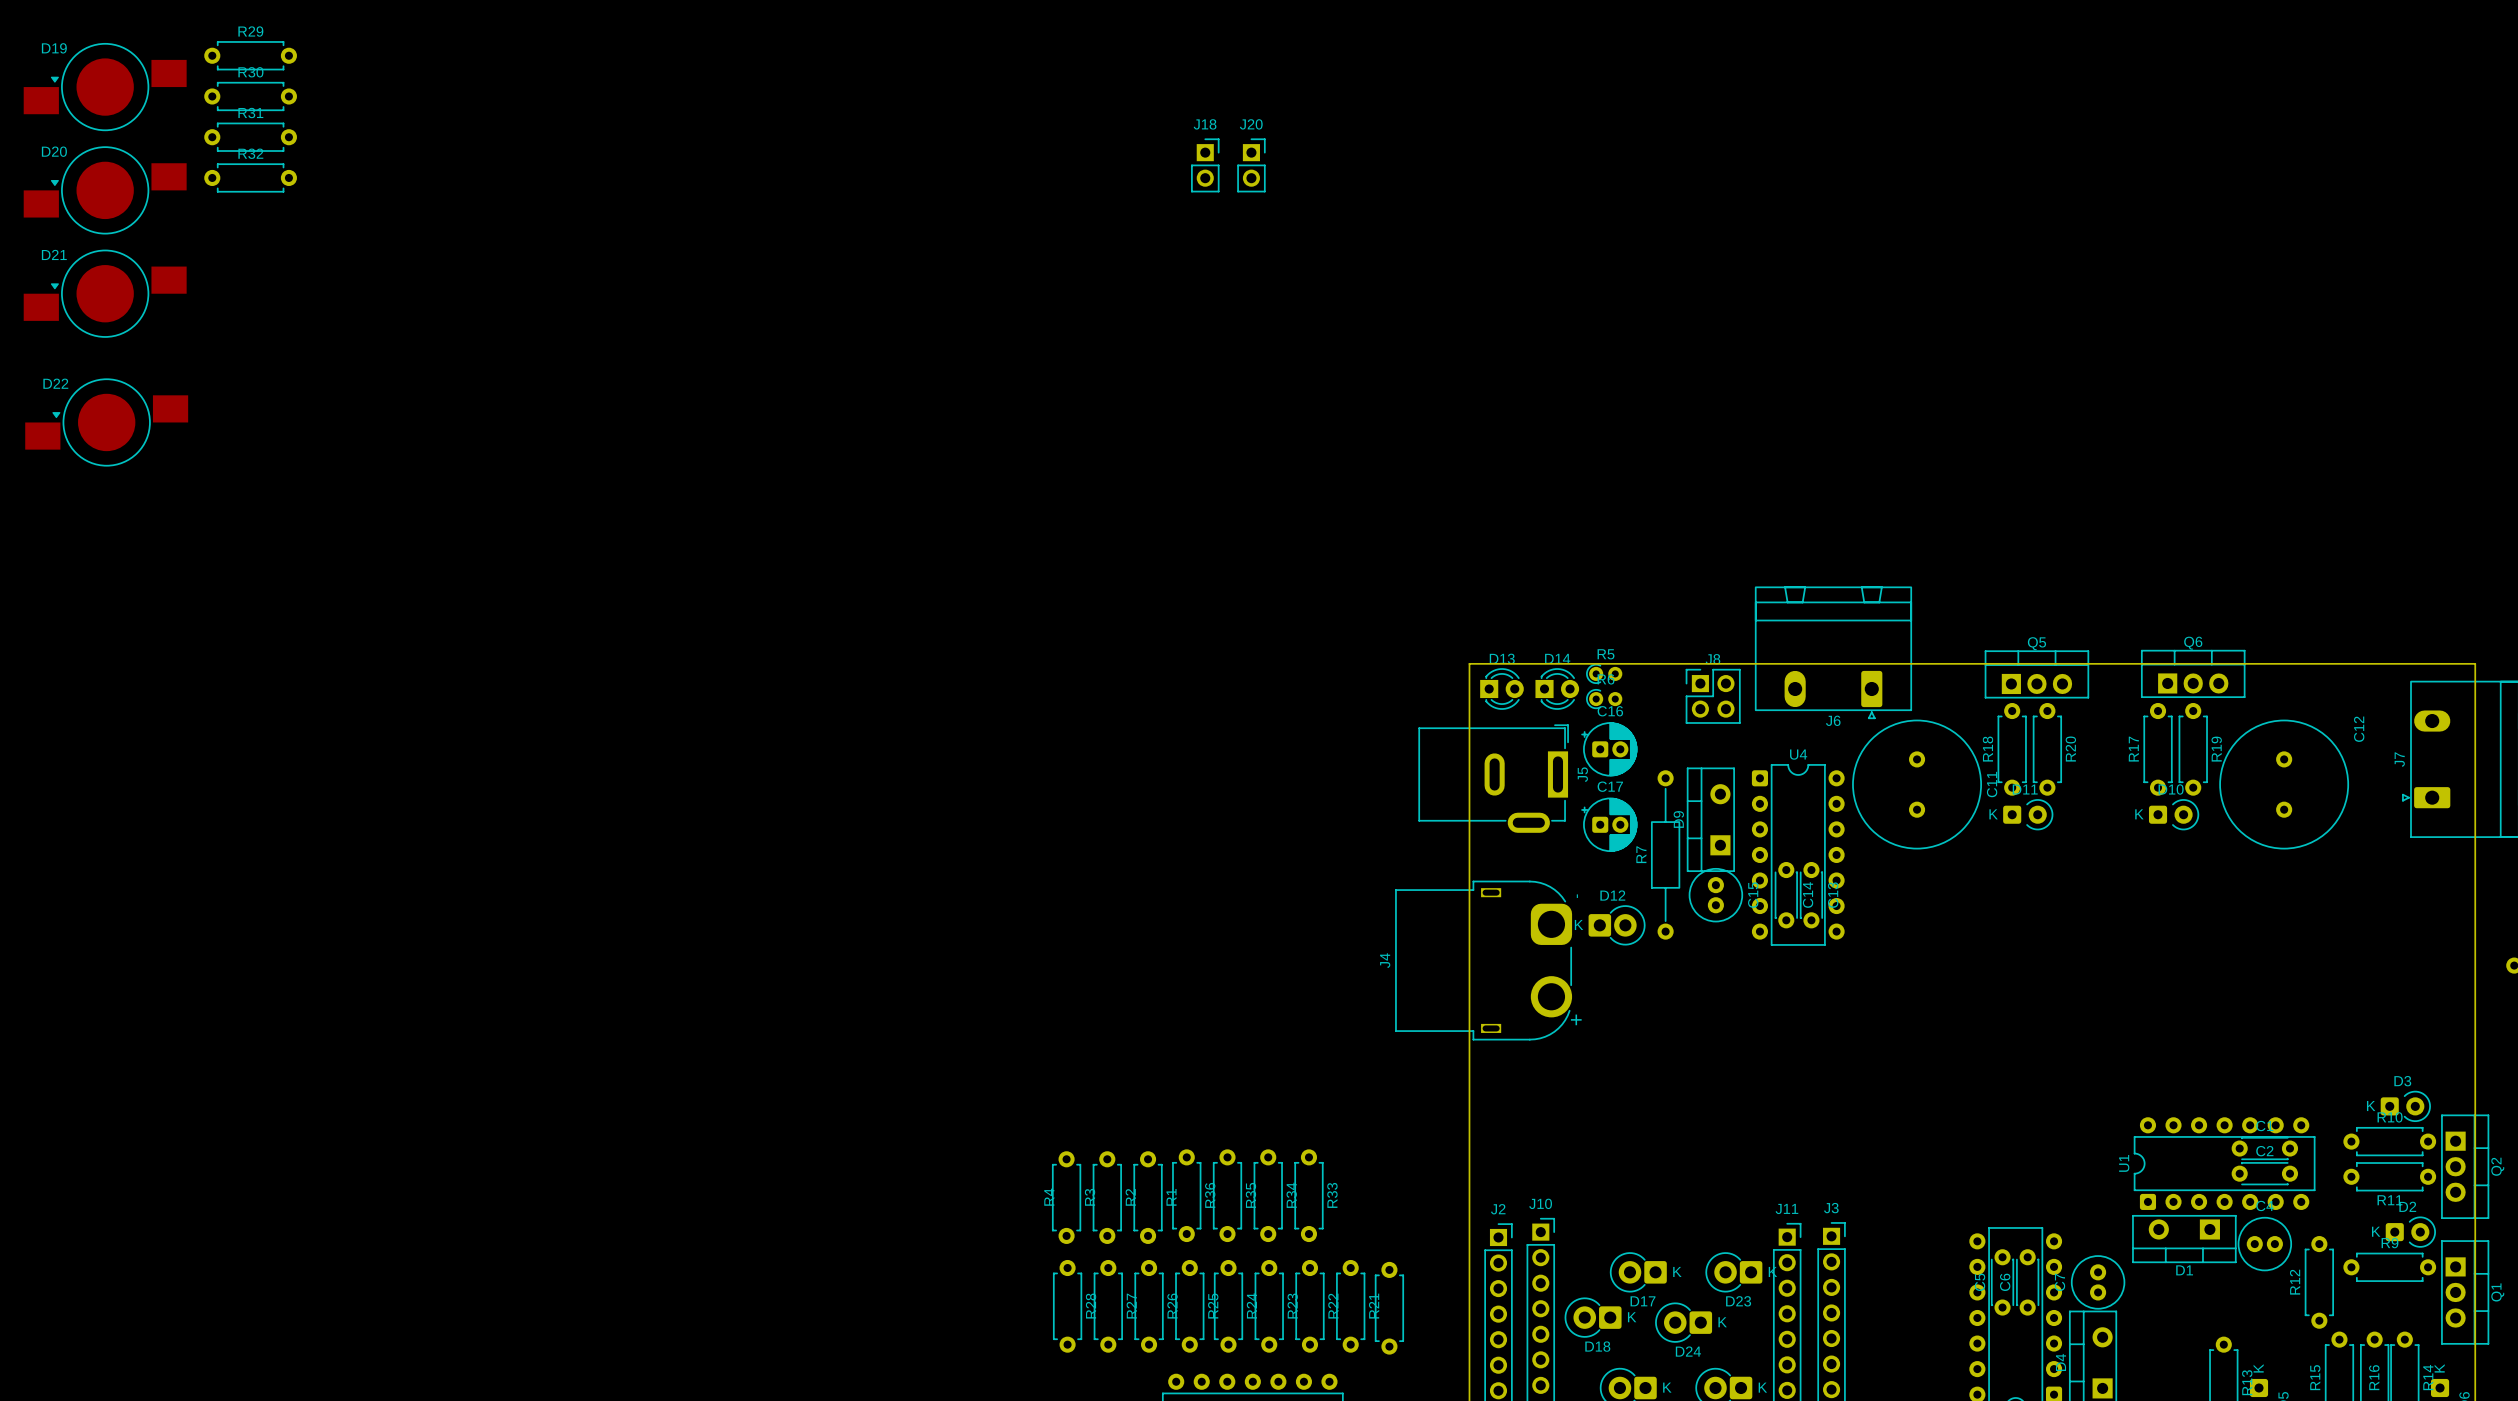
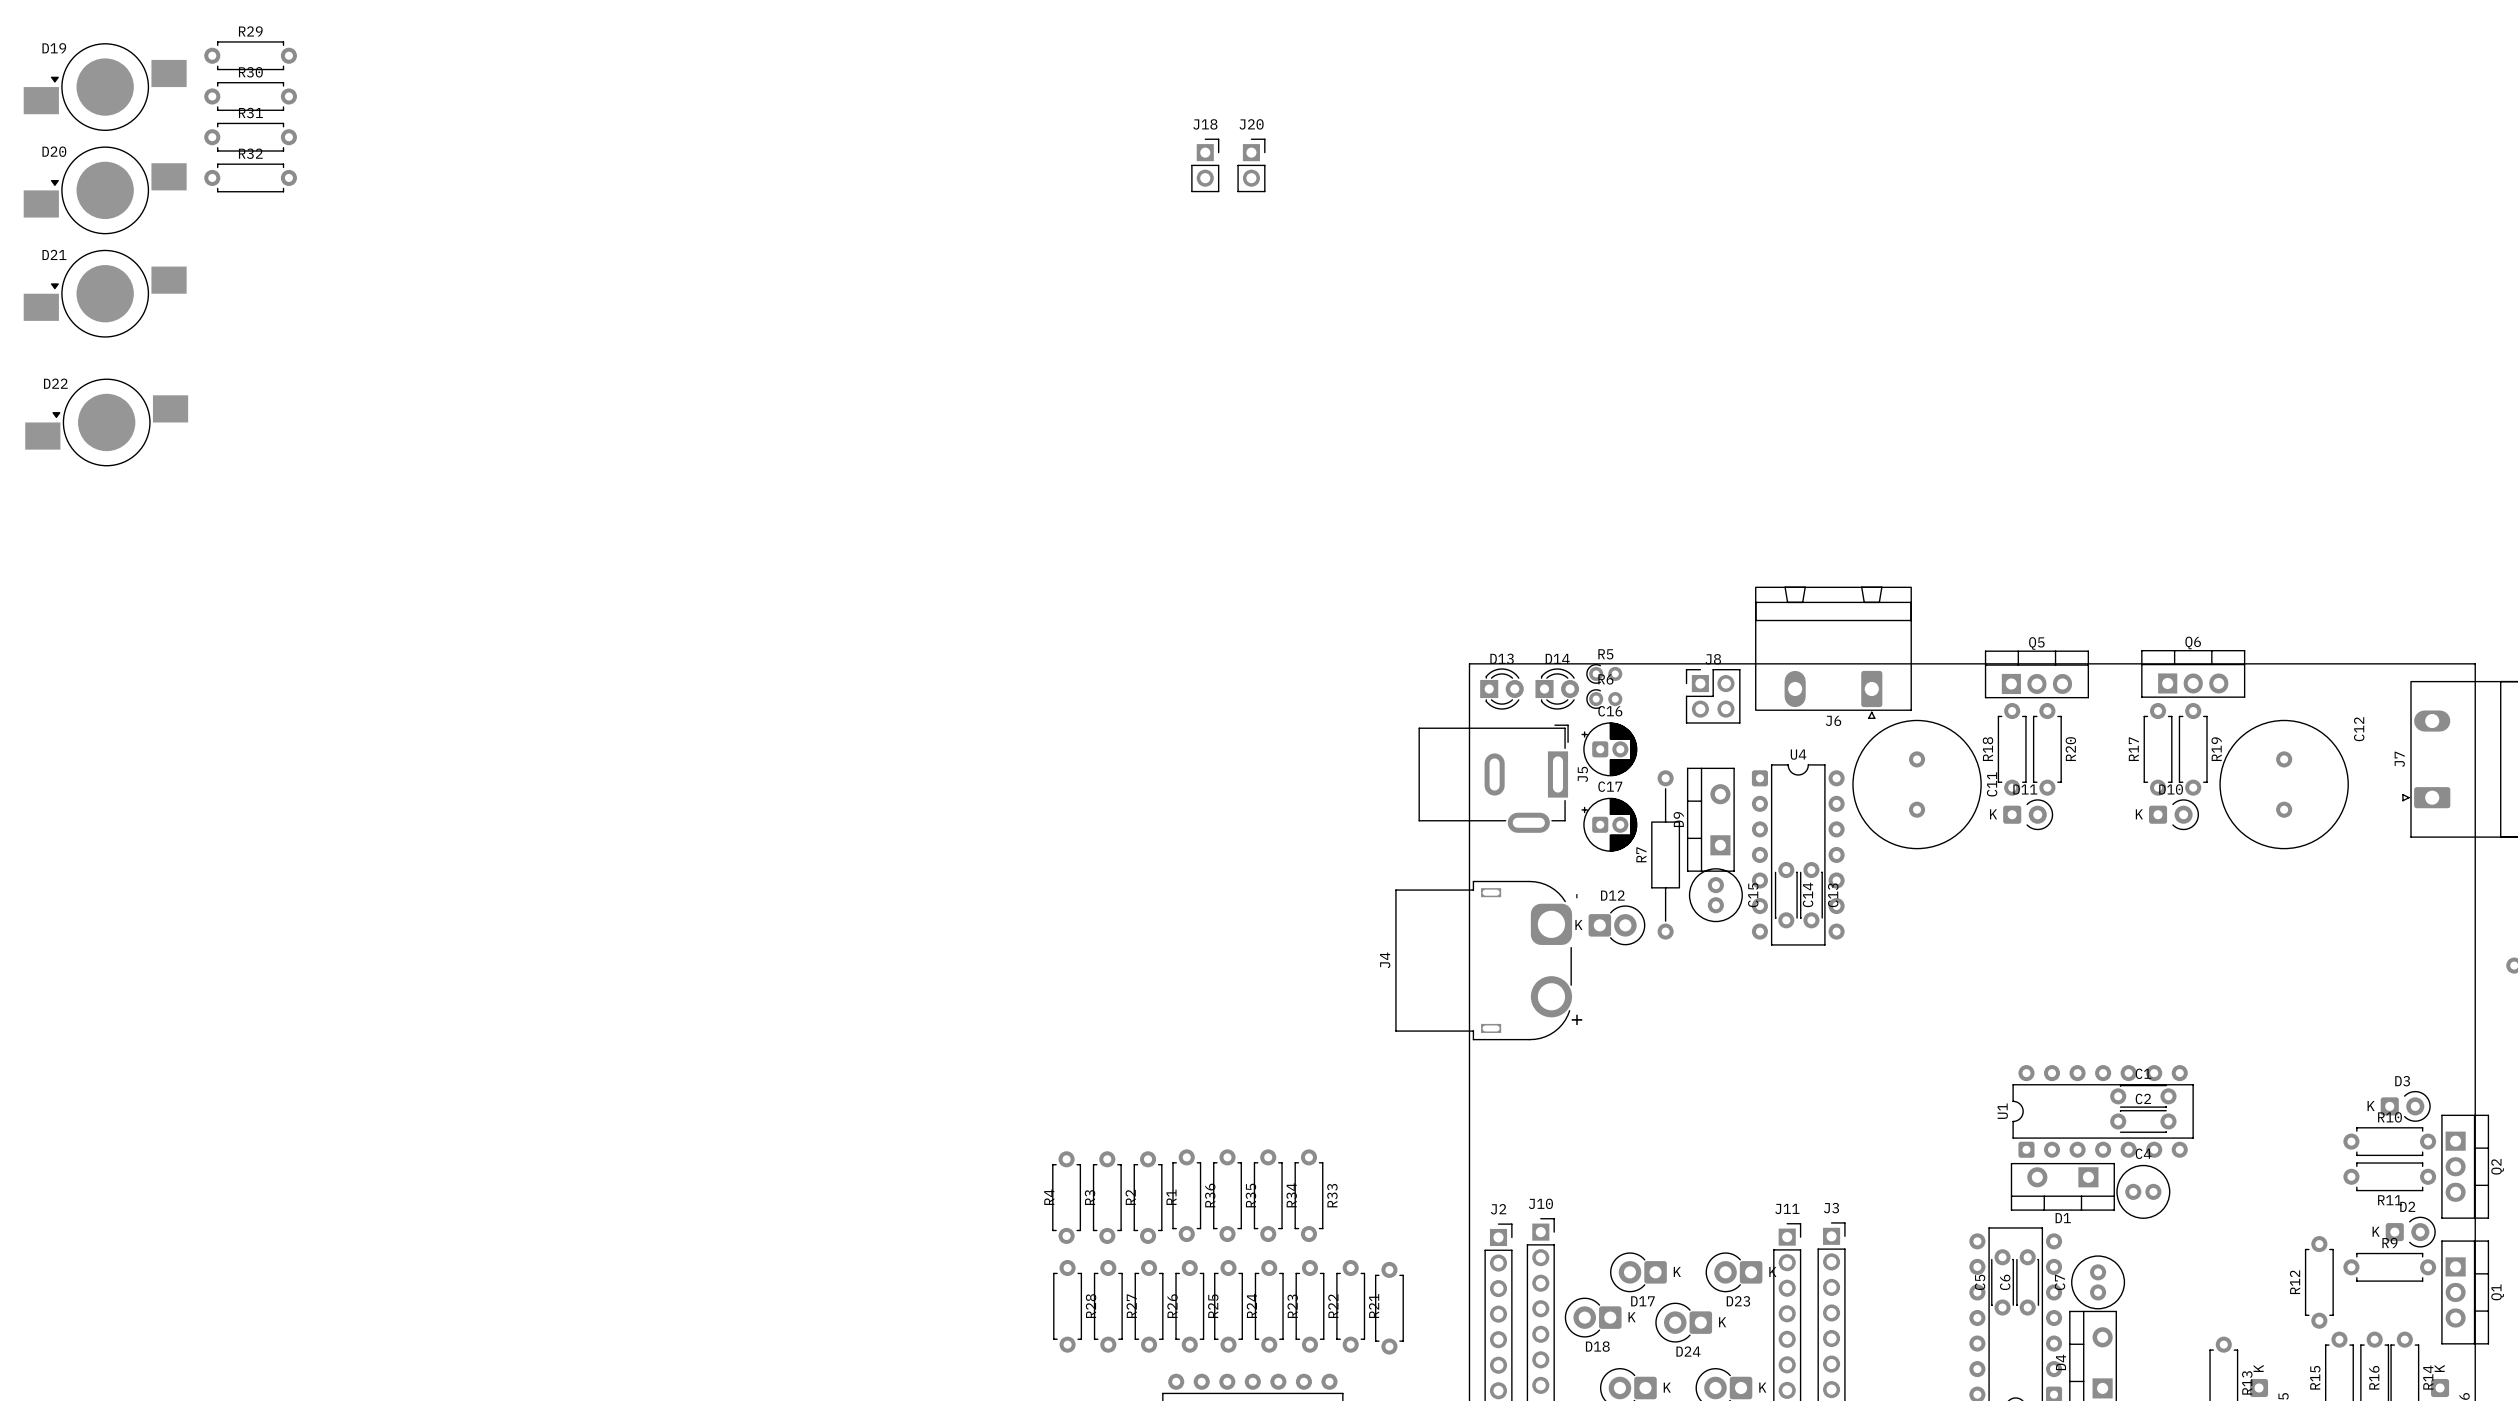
C1 position: (2264, 1148) -> (2143, 1096)
U1 position: (2224, 1163) -> (2103, 1111)
C2 position: (2264, 1173) -> (2143, 1121)
D1 position: (2184, 1239) -> (2062, 1186)
C4 position: (2264, 1244) -> (2143, 1191)

